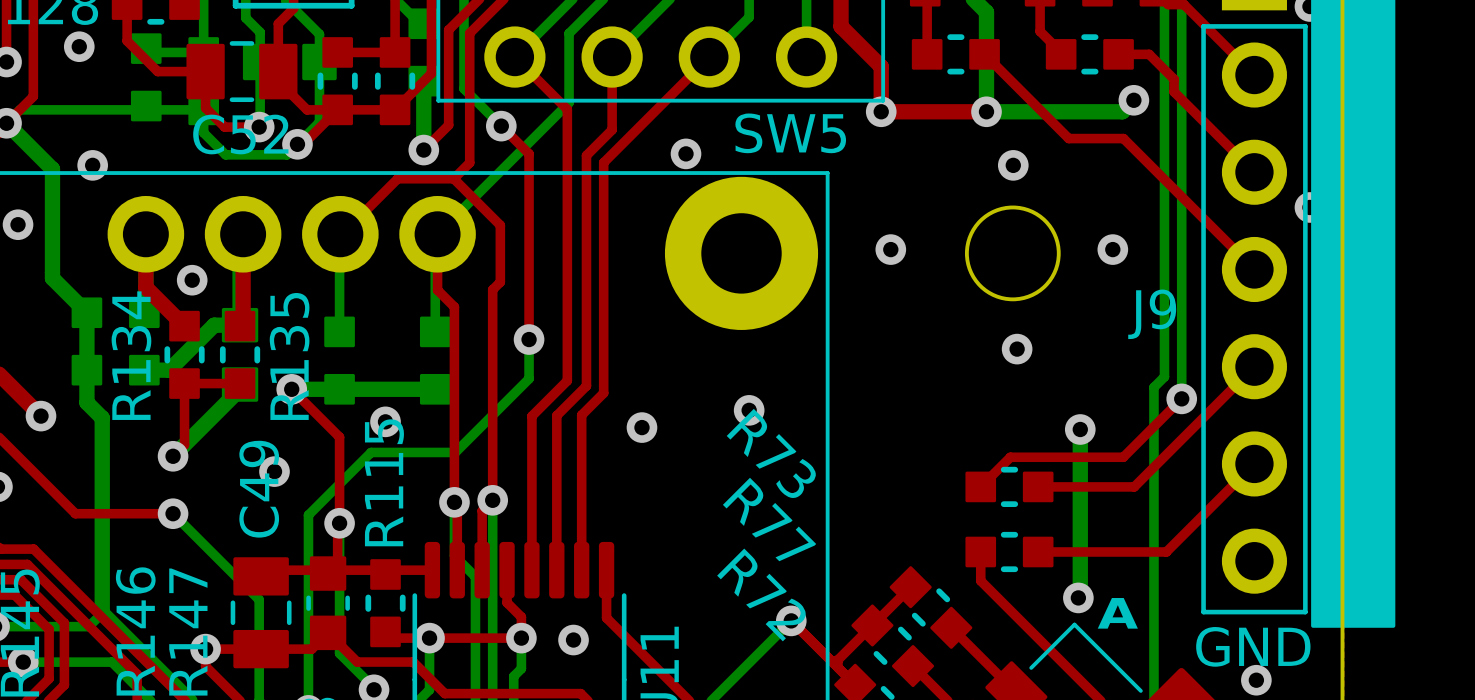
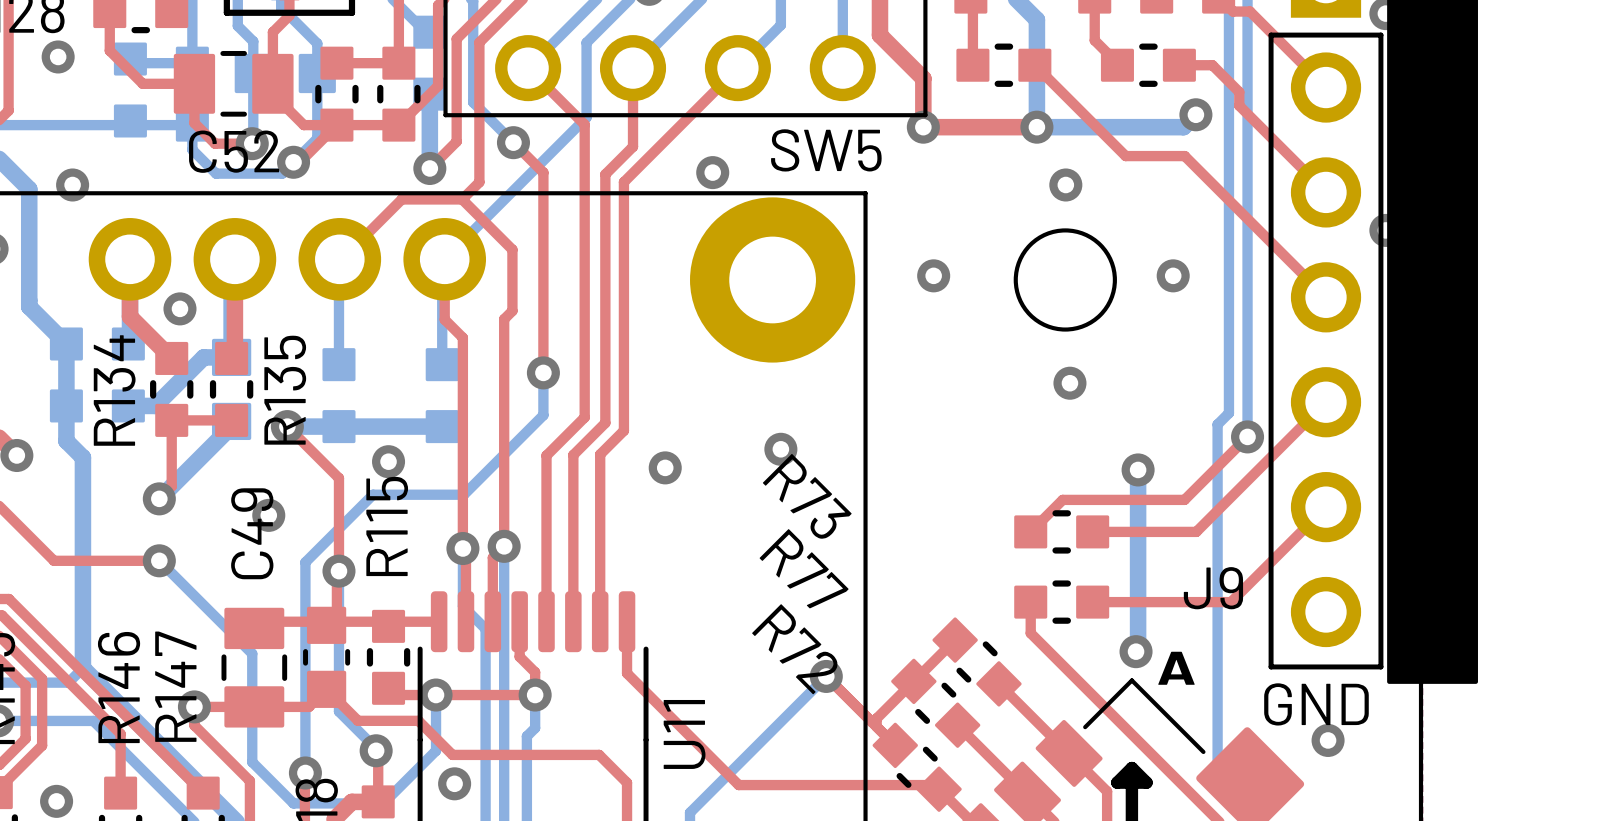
J9 name position: J9 (1152, 314) -> J9 (1213, 588)
via: (573, 640) -> none

